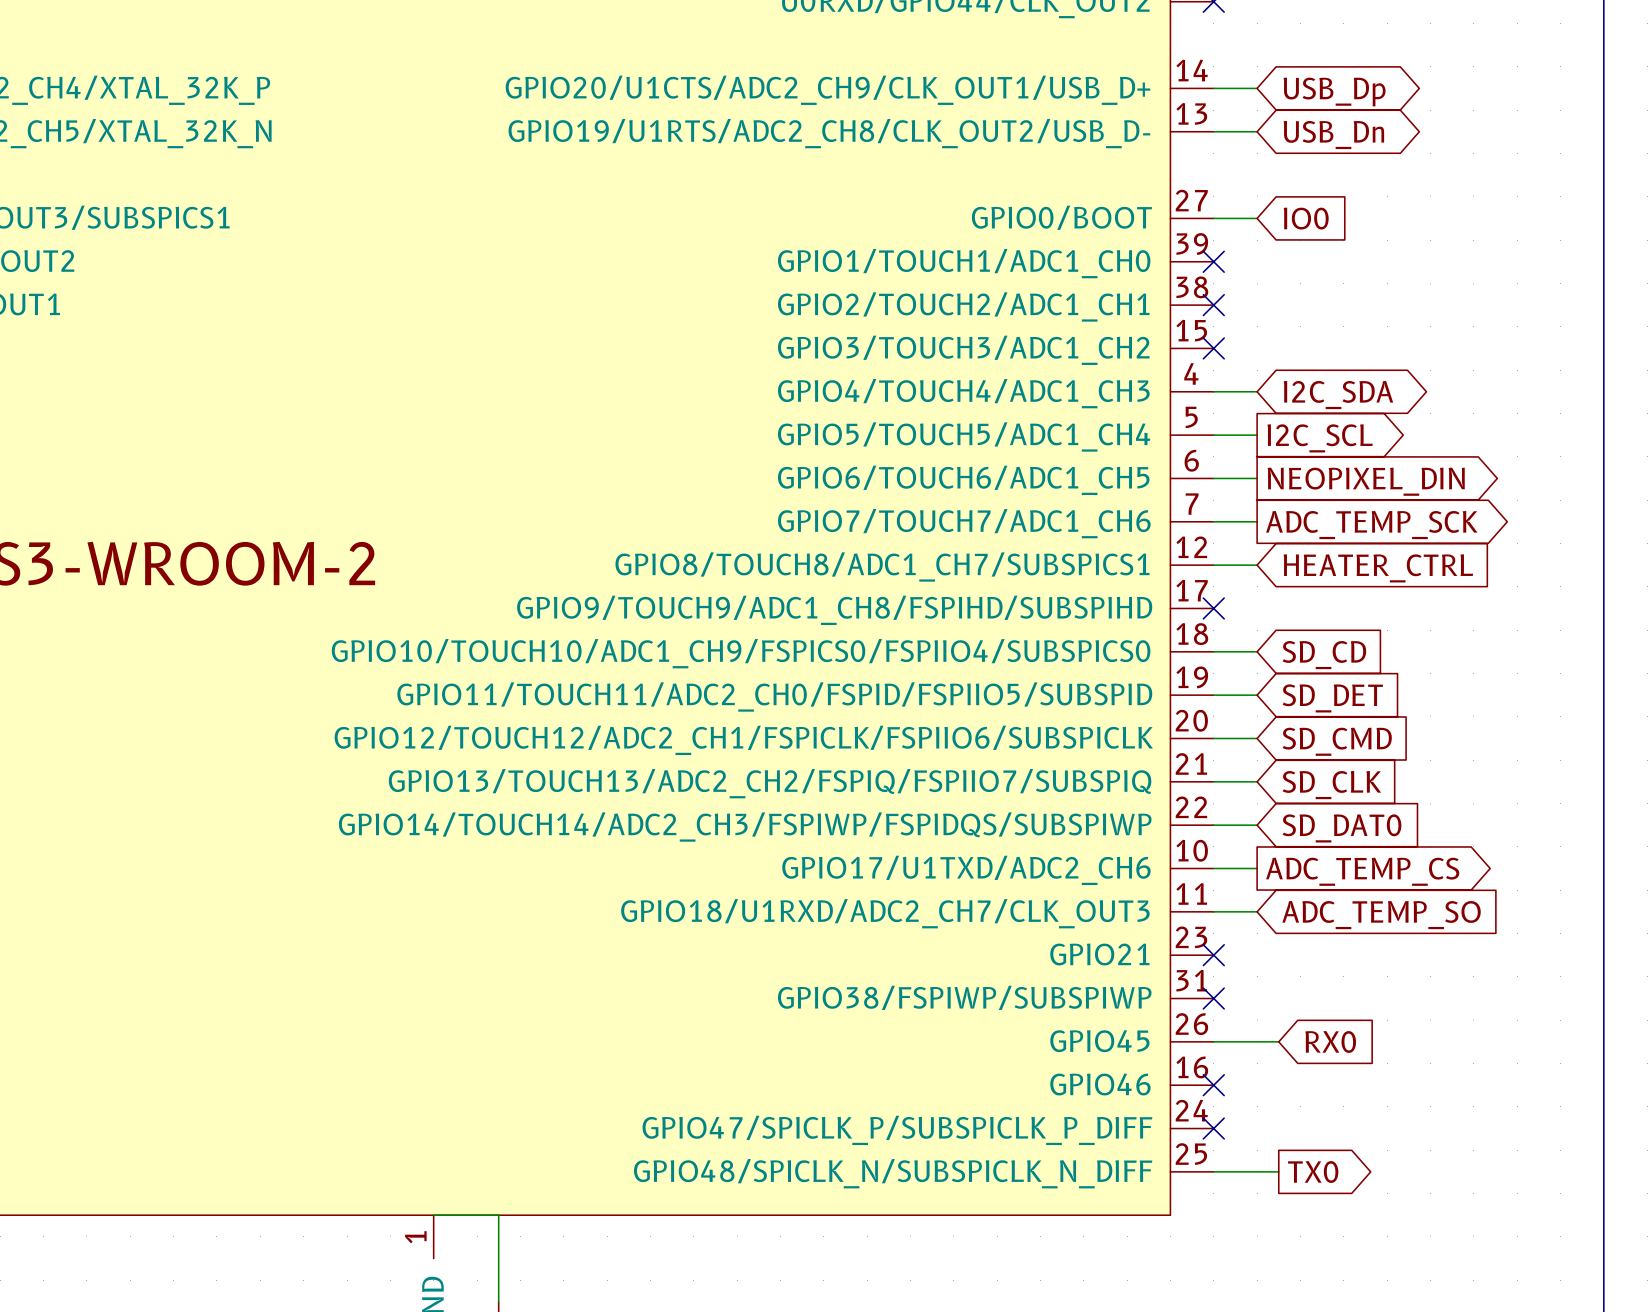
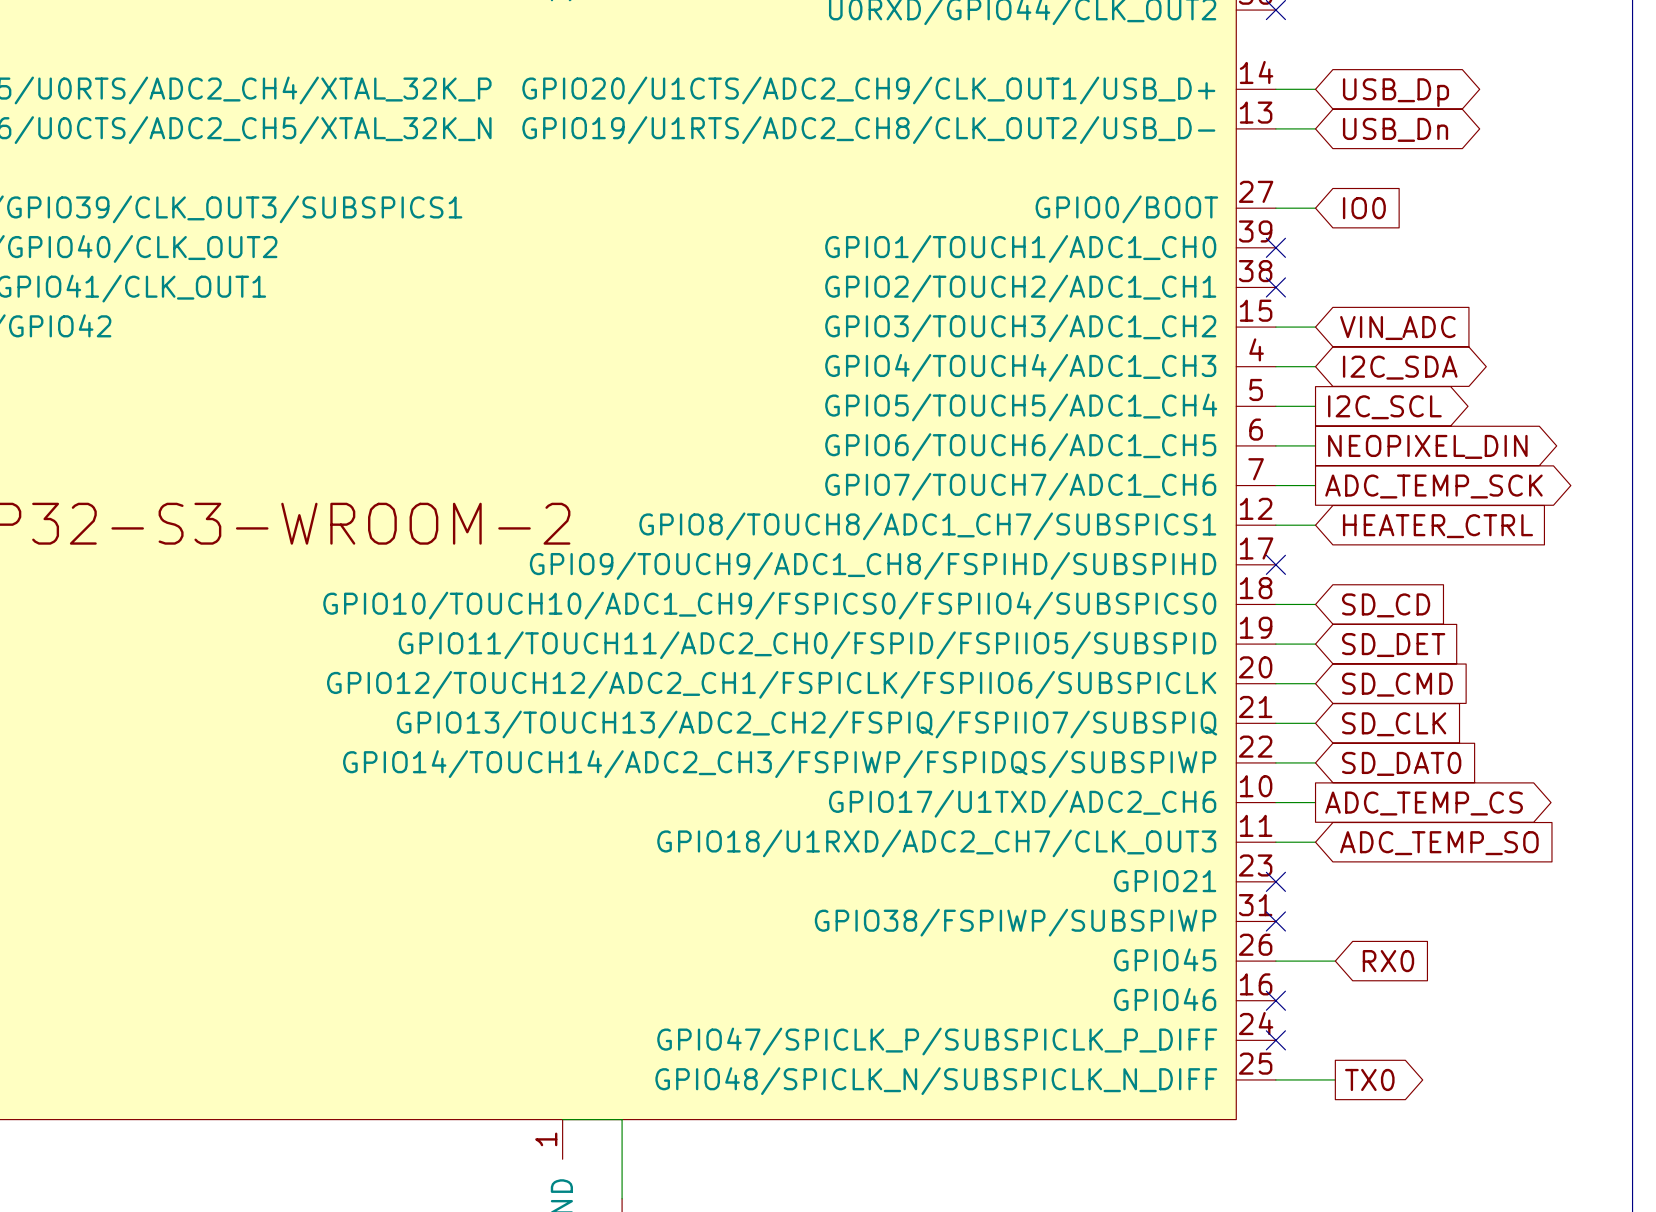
wire: none -> (1275, 327) (1315, 327)
no-connect mark: (1213, 348) -> none
global label: none -> VIN_ADC (1397, 328)

